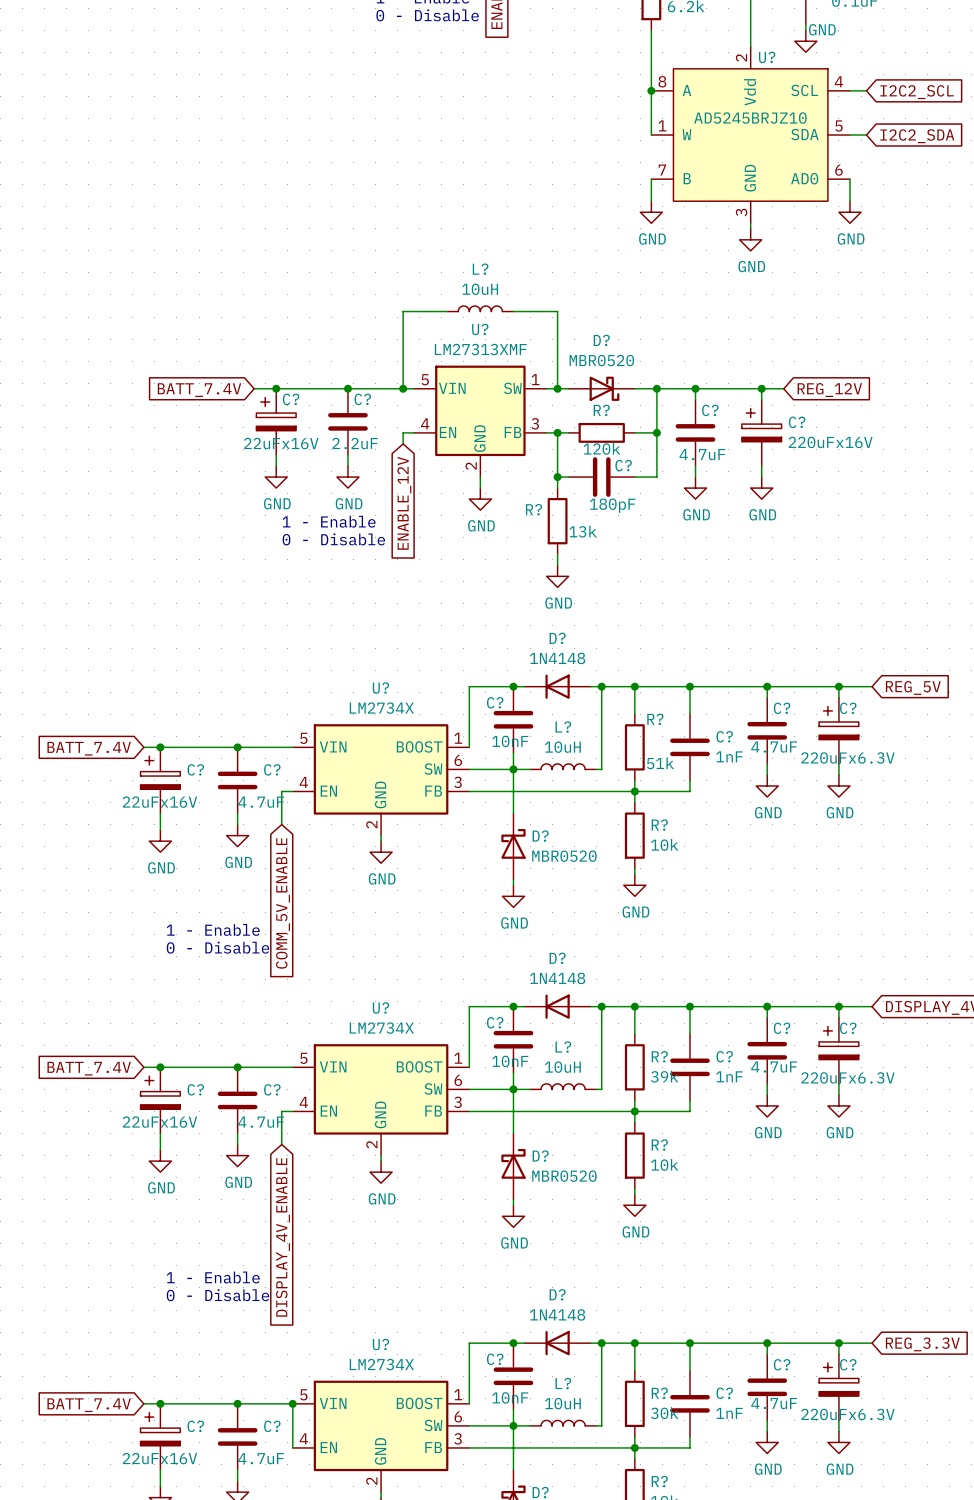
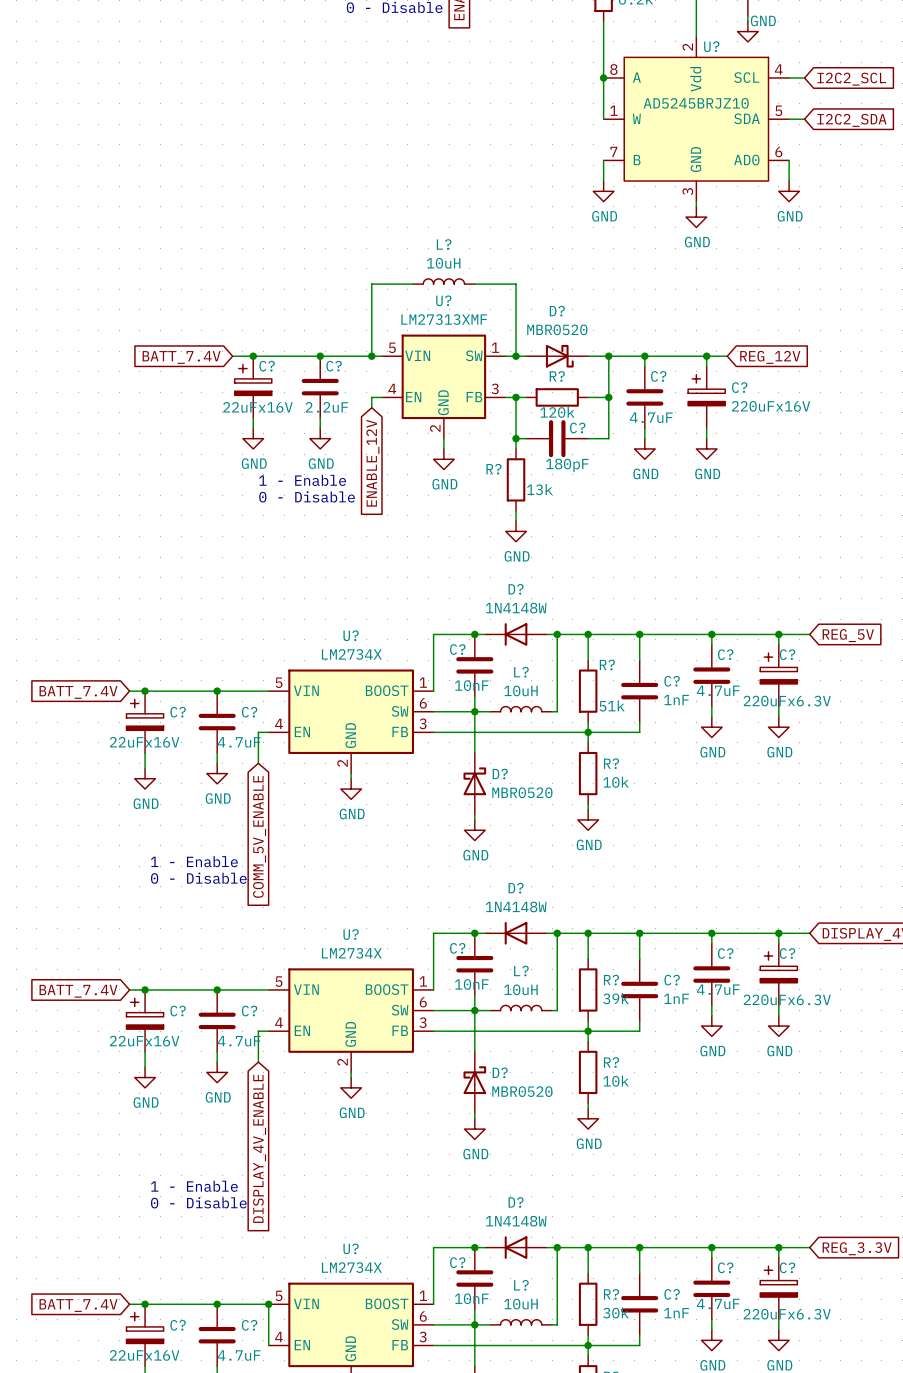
D? value: 1N4148 (557, 658) -> 1N4148W (516, 608)
D? value: 1N4148 (557, 978) -> 1N4148W (516, 906)
D? value: 1N4148 (557, 1314) -> 1N4148W (516, 1221)

